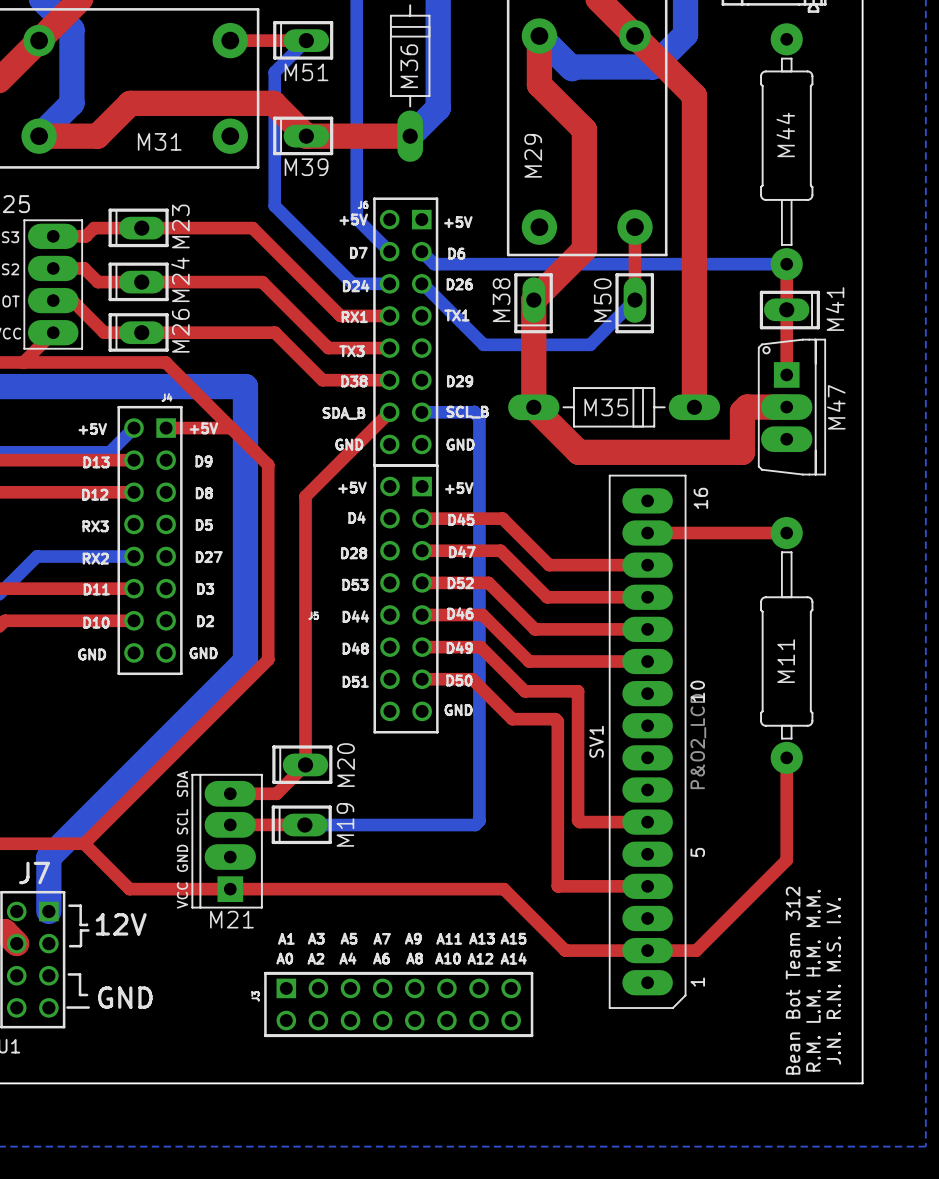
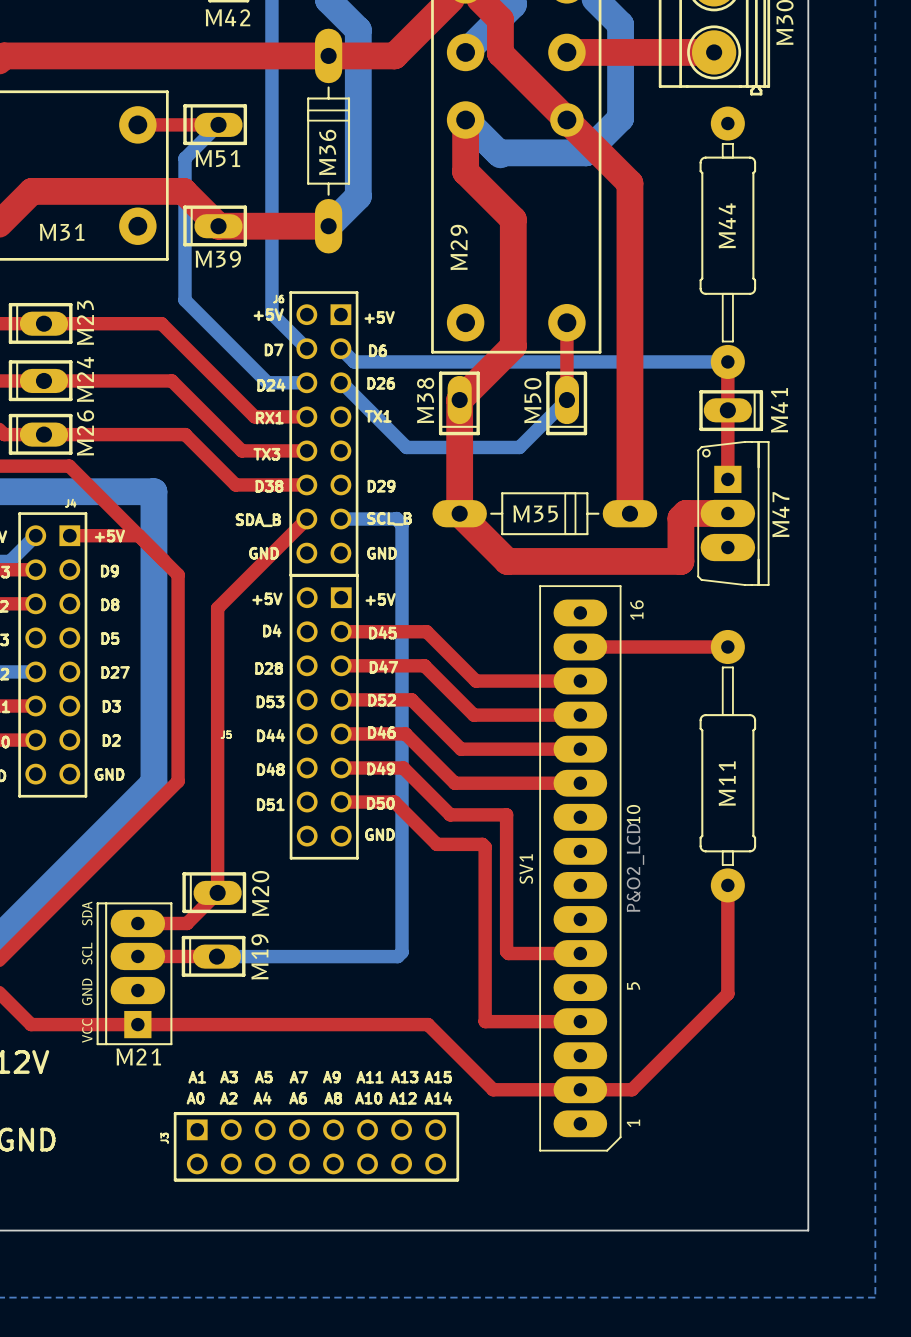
text: Bean Bot Team 312 (793, 980) -> none
text: R.M. L.M. H.M. M.M. (813, 980) -> none
text: J.N. R.N. M.S. I.V. (833, 981) -> none

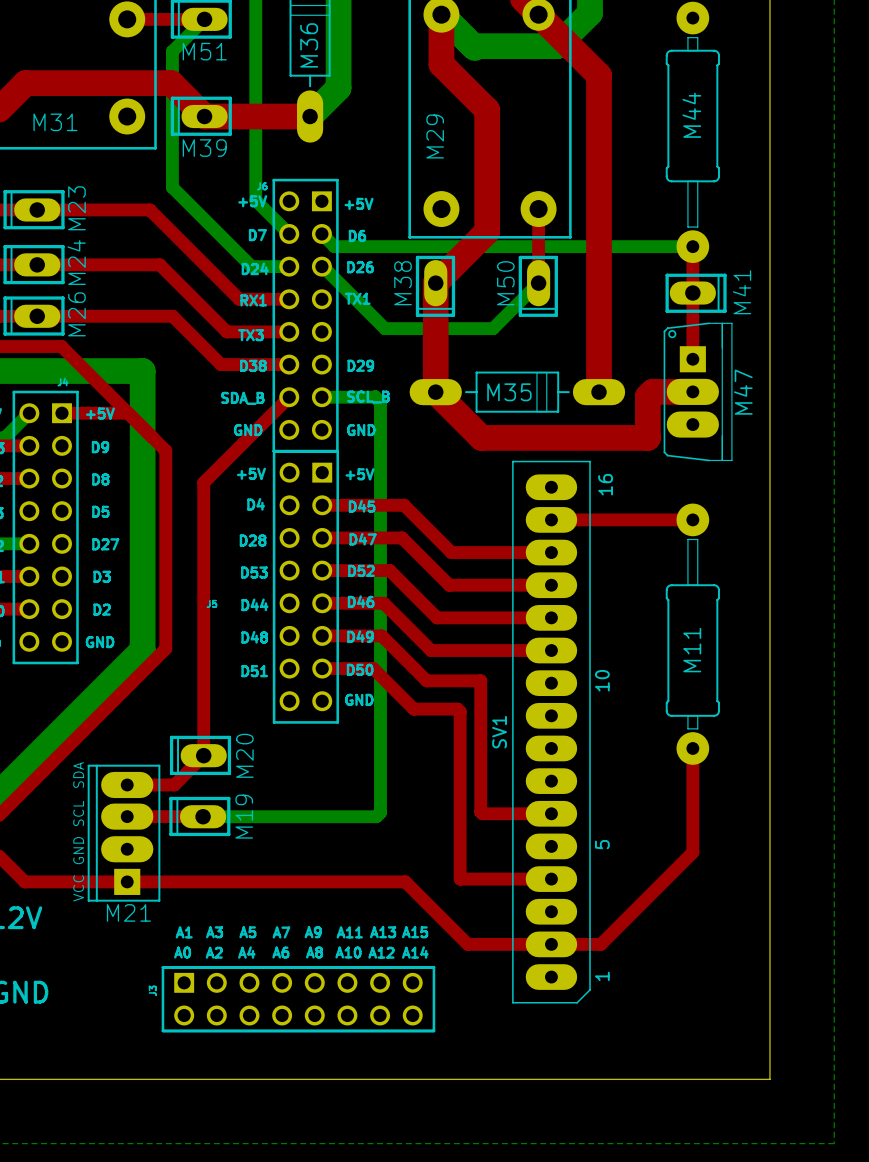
SV1 value: P&O2_LCD (635, 867) -> none

